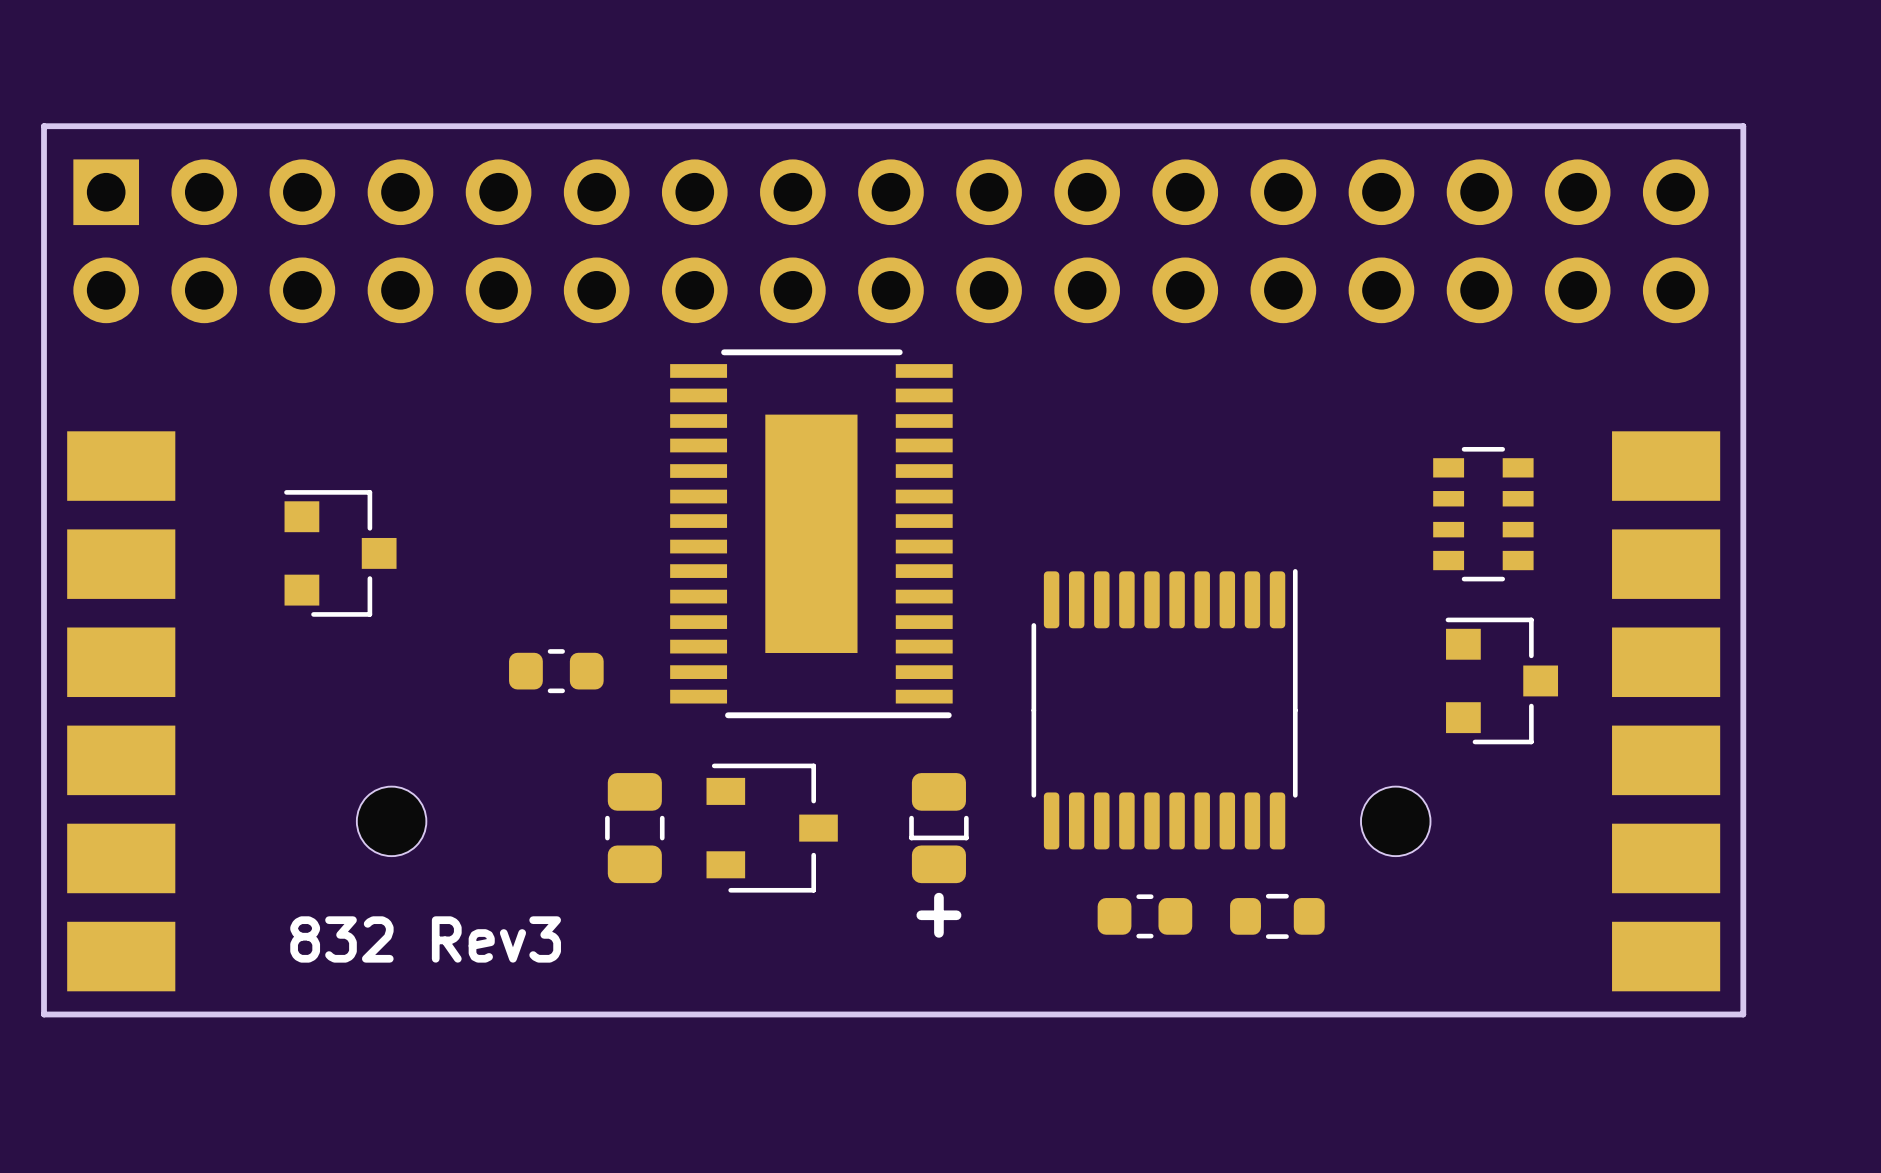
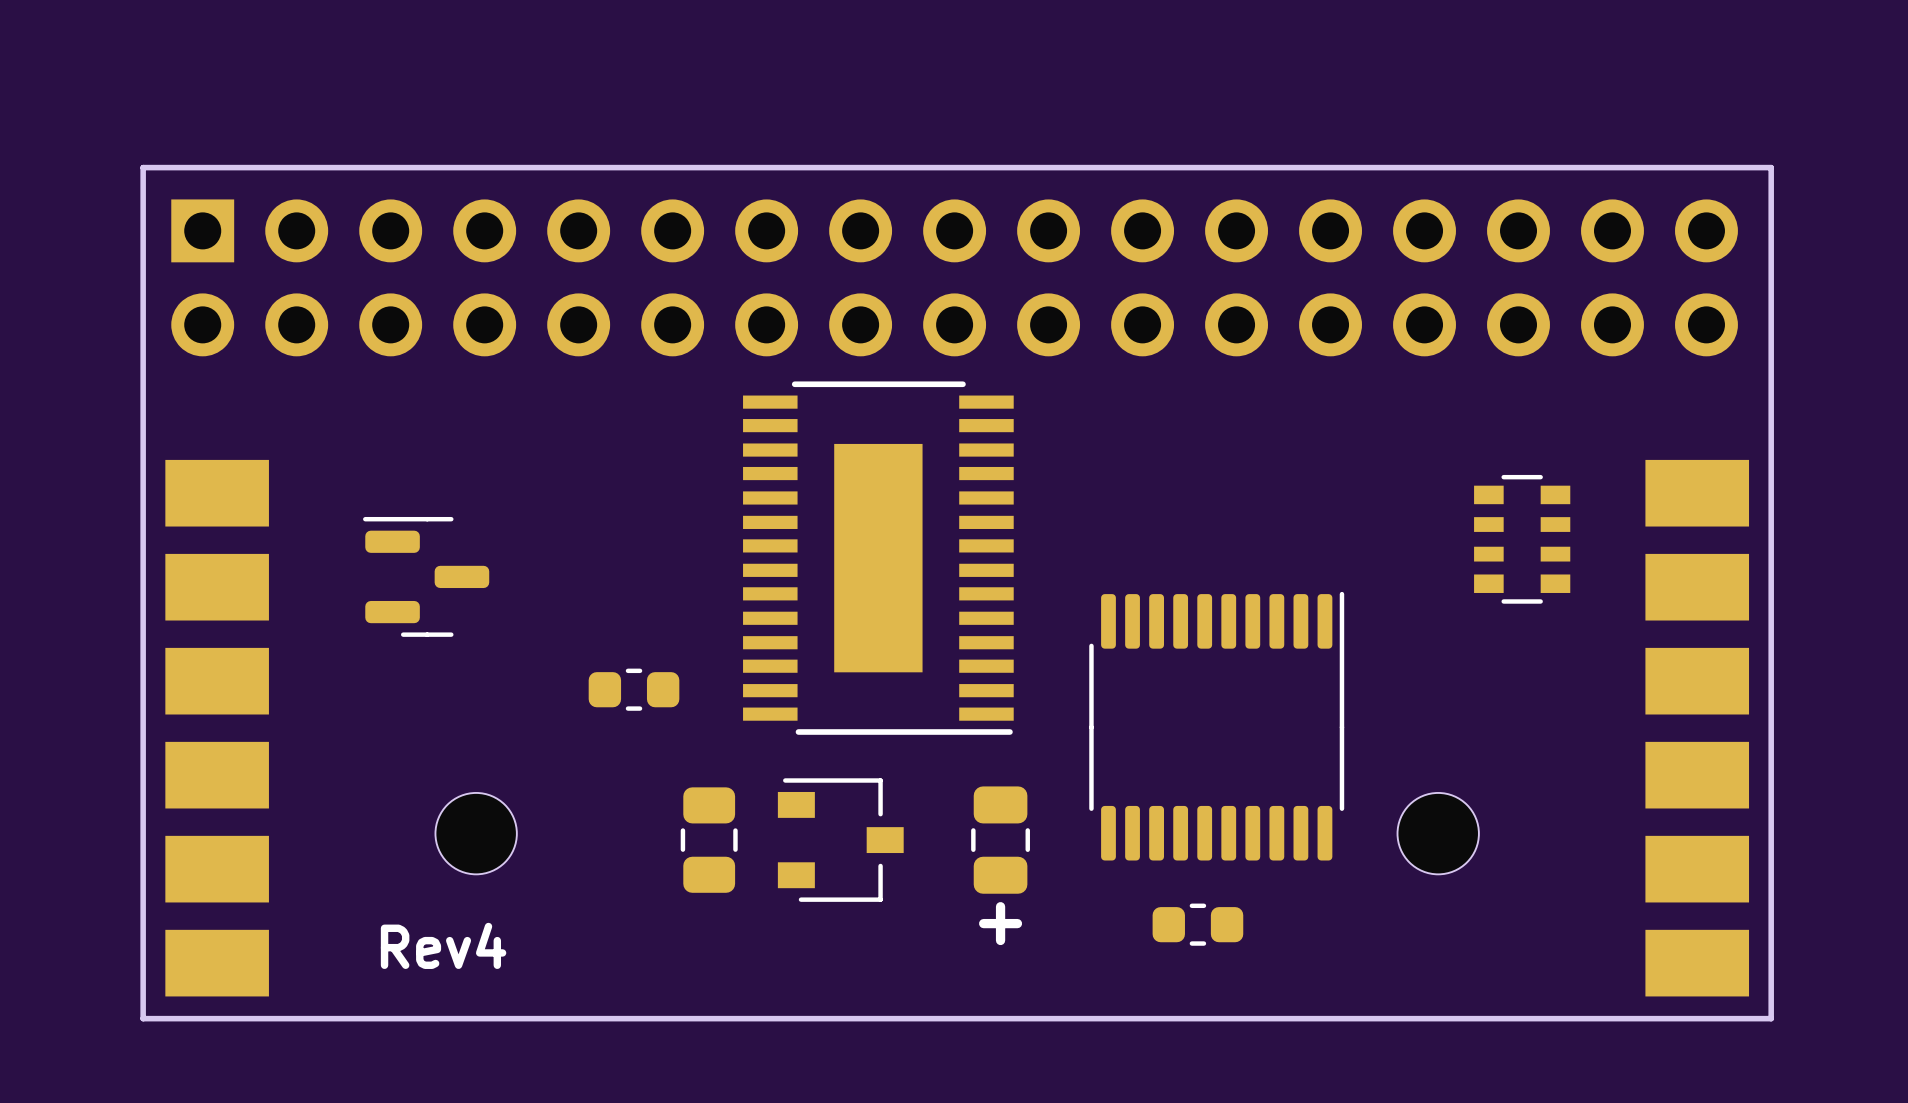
part footprint: [284, 490, 397, 617] -> [363, 516, 490, 637]
part: (1501, 680) -> none
part footprint: [909, 773, 969, 884] -> [971, 786, 1030, 894]
part footprint: [356, 786, 427, 857] -> [435, 792, 517, 875]
part footprint: [1360, 786, 1431, 857] -> [1397, 792, 1479, 875]
part: (1277, 916) -> none
text: 832 Rev3 (425, 939) -> Rev4 (443, 945)

